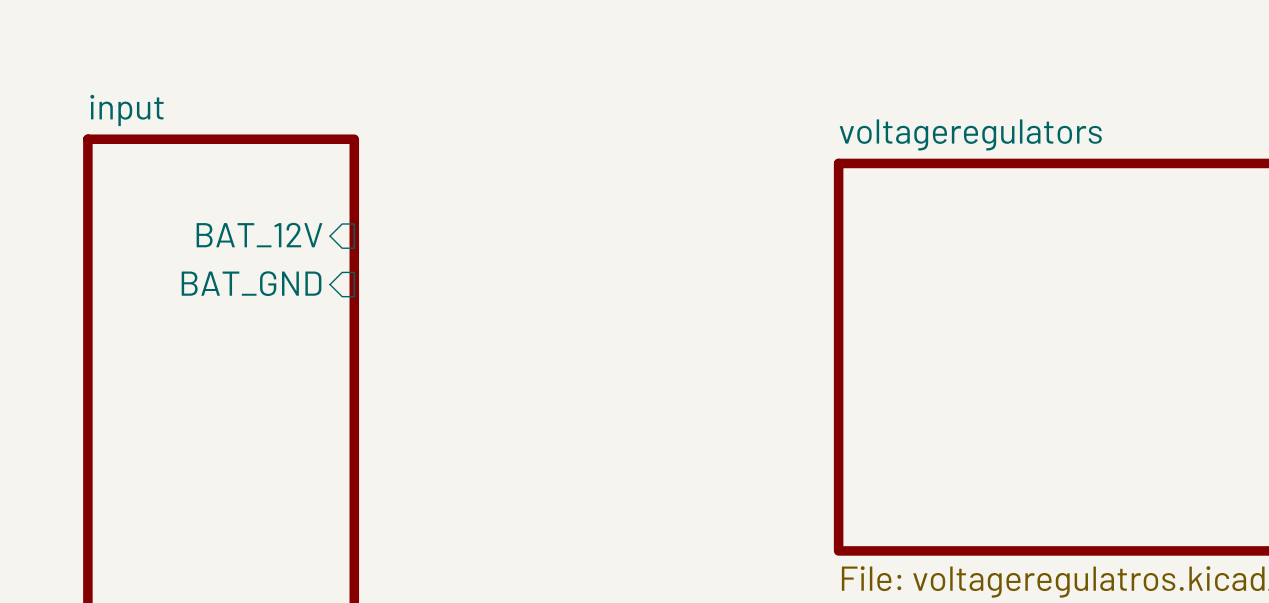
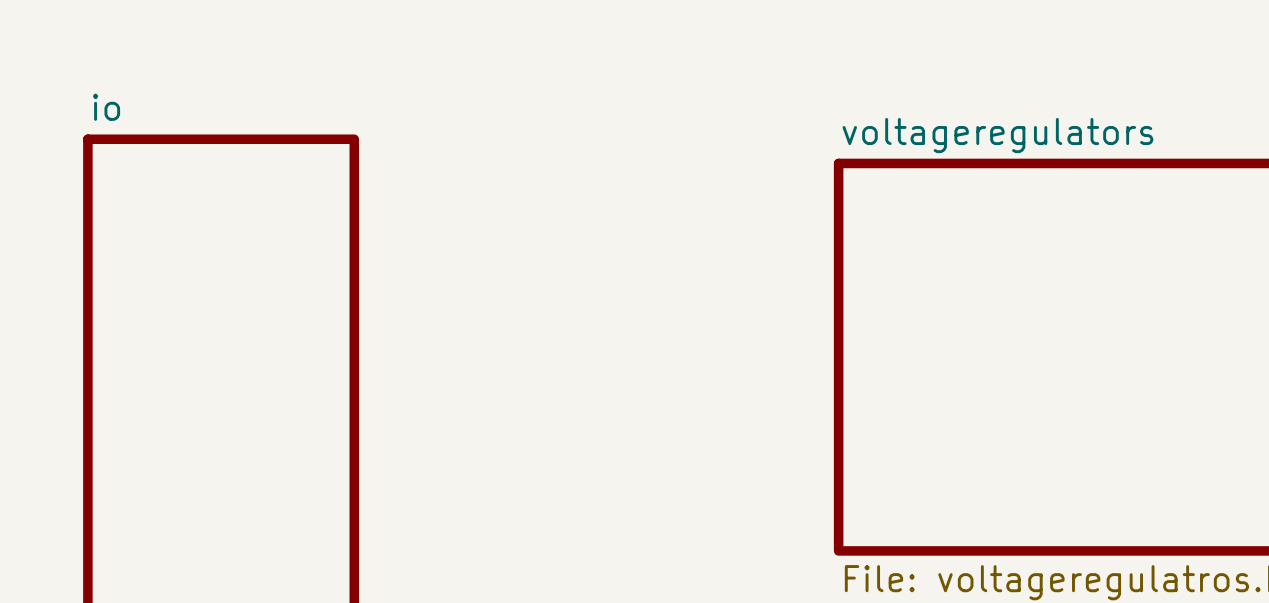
sheet input name: input (127, 110) -> io (106, 107)
sheet pin: BAT_12V (259, 235) -> none
sheet pin: BAT_GND (251, 283) -> none

